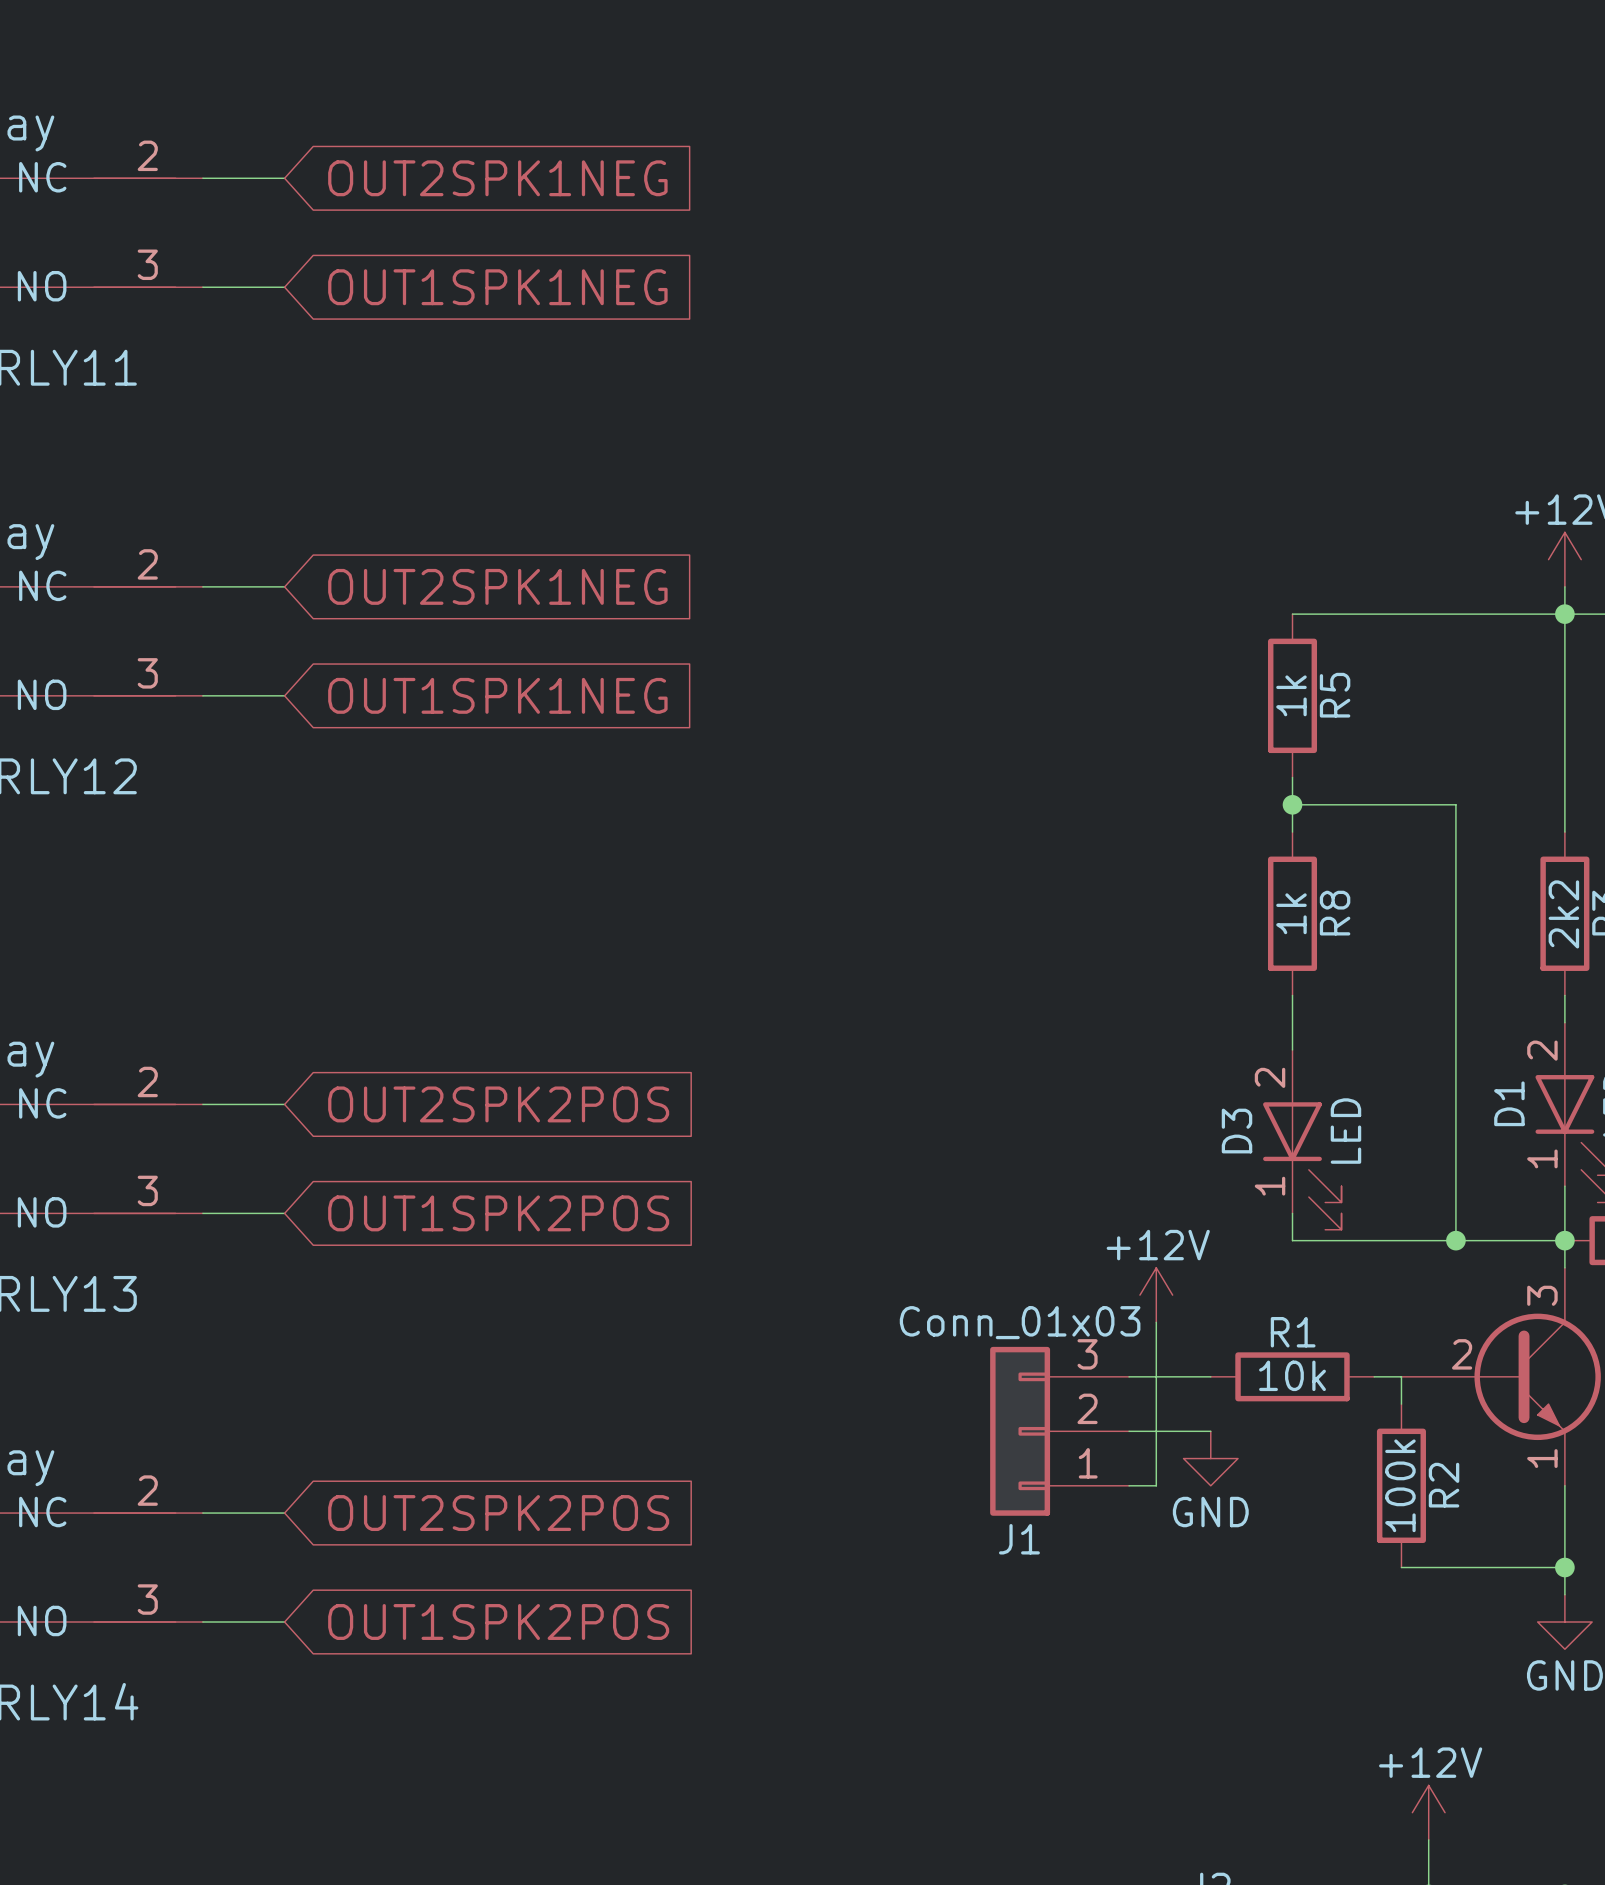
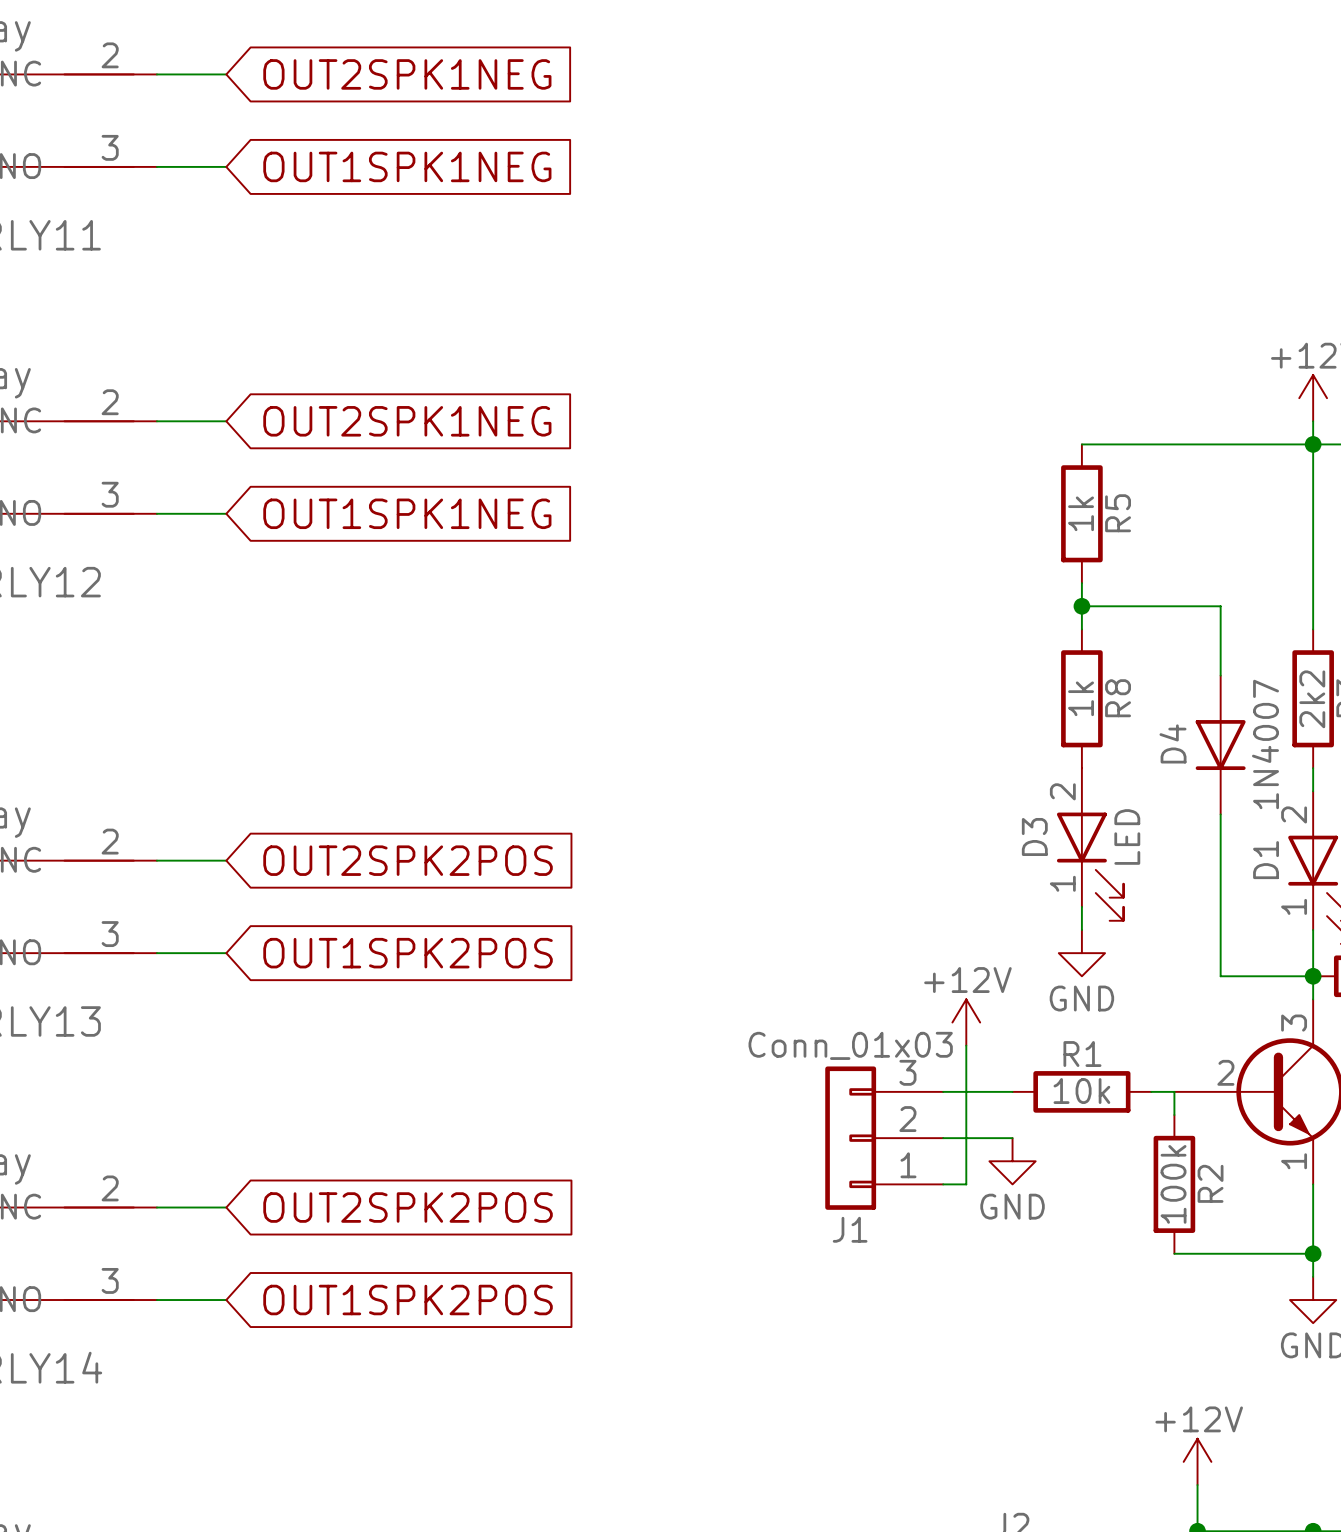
D4: none -> 1N4007 (1220, 745)
D3 position: (1302, 1139) -> (1090, 844)
wire: (1292, 1213) (1292, 1240) (1455, 1240) -> none
power symbol: none -> GND (1081, 953)
junction: (1455, 1240) -> none

